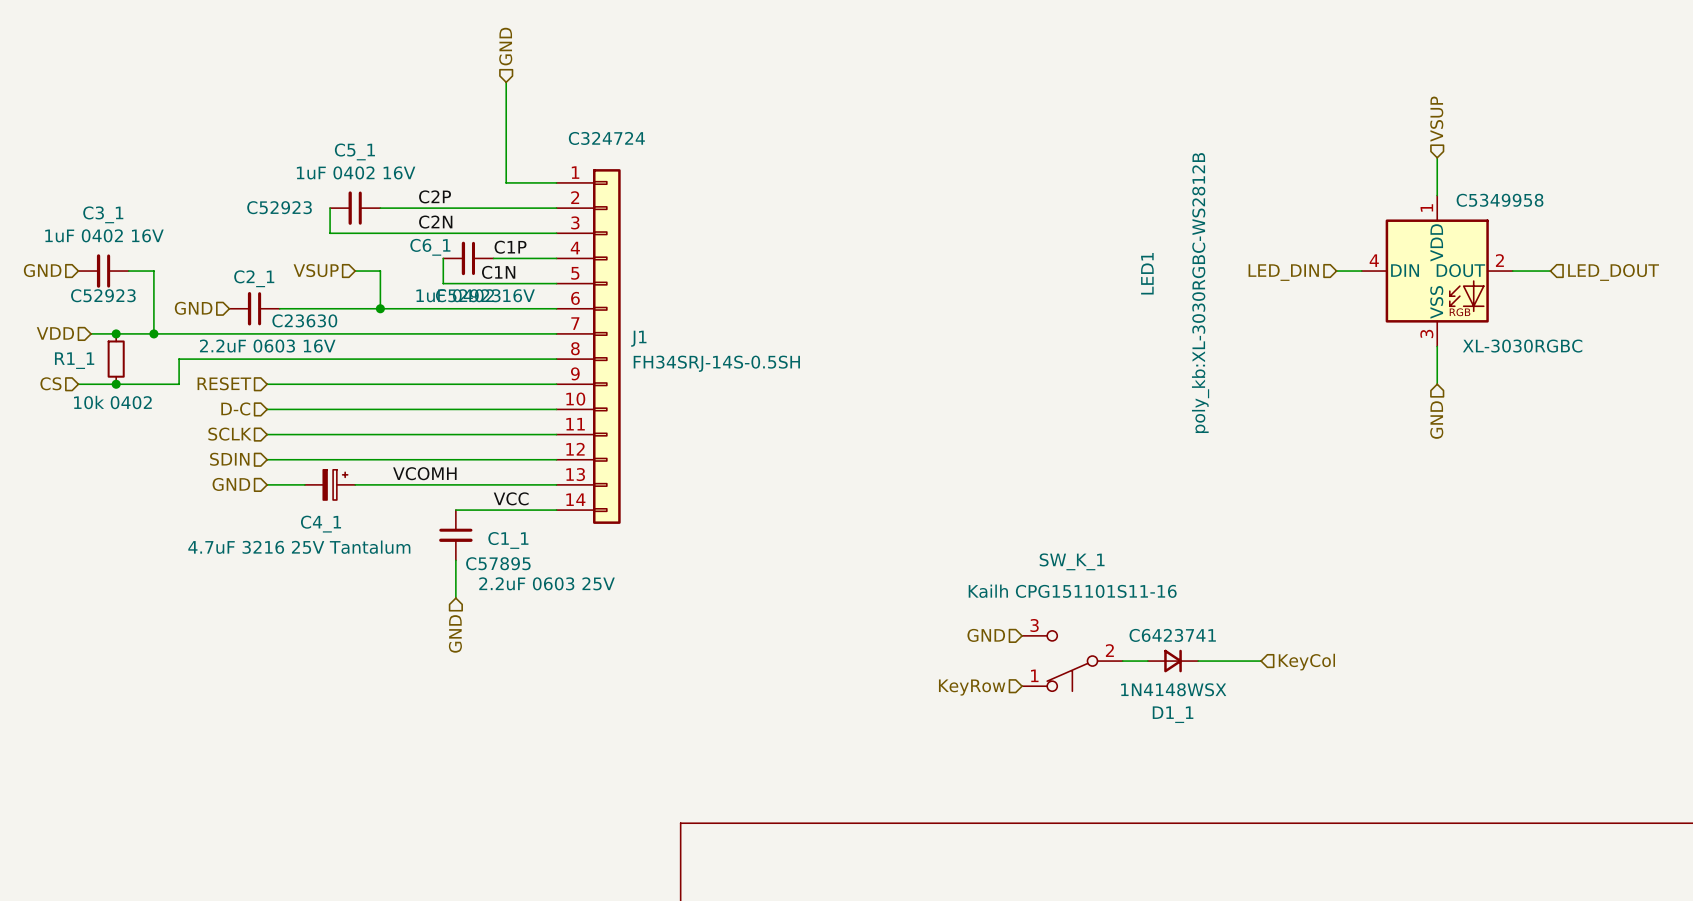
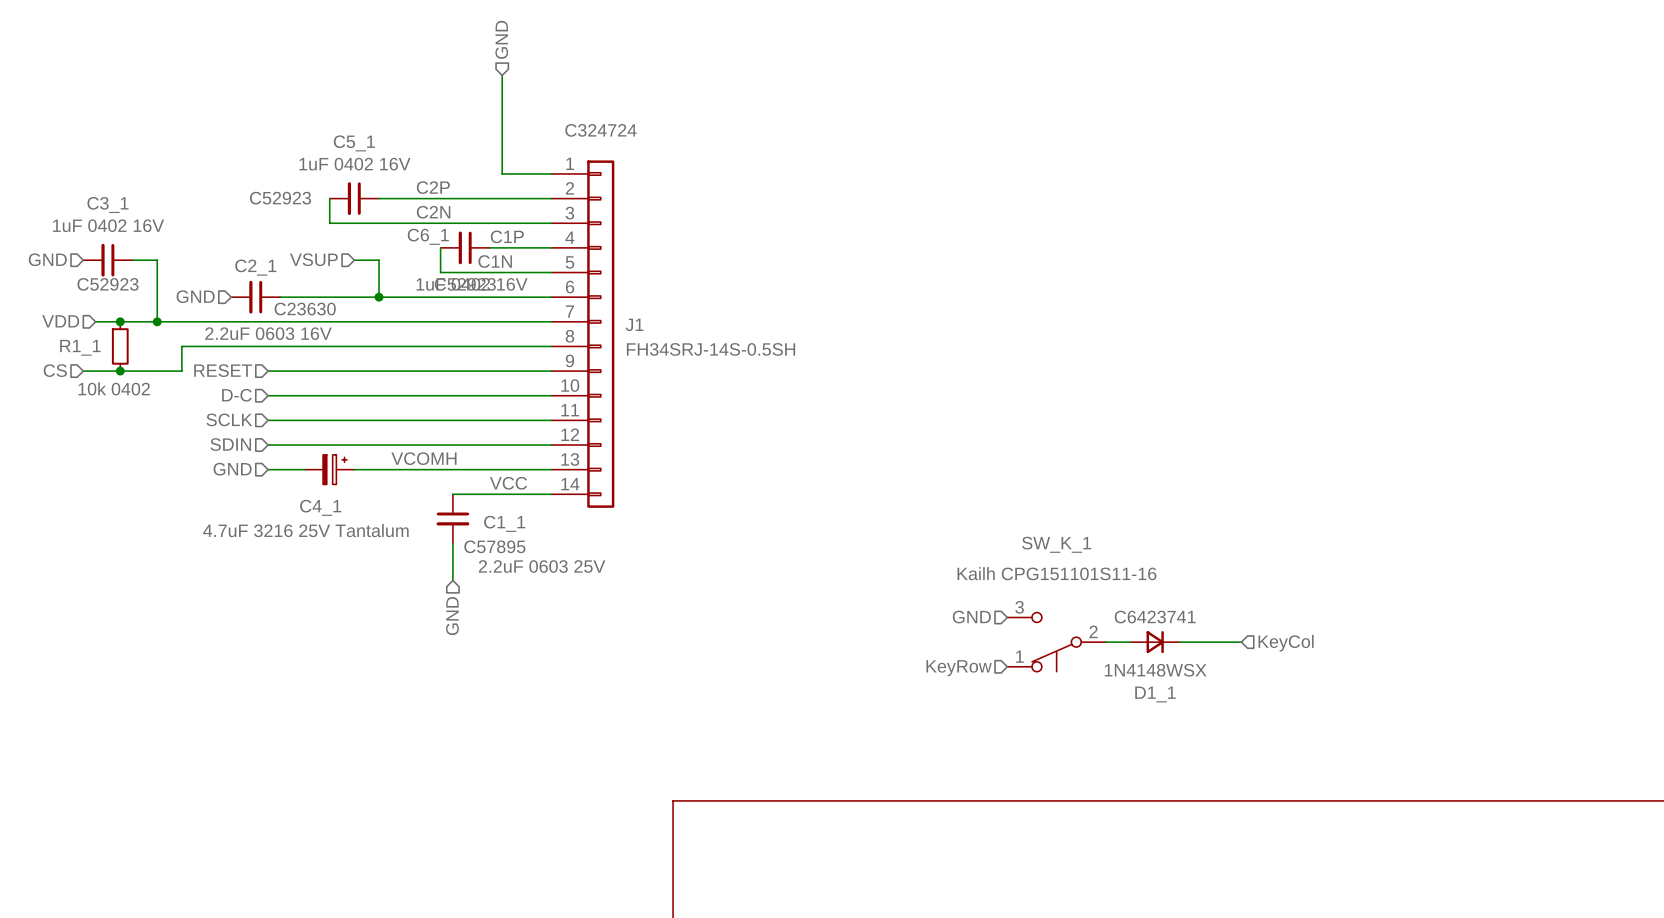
hierarchical label: VSUP (1436, 119) -> none
wire: (1437, 157) (1437, 195) -> none
wire: (1336, 271) (1361, 271) -> none
LED1: XL-3030RGBC (1437, 271) -> none
wire: (1512, 271) (1550, 271) -> none
hierarchical label: LED_DIN (1283, 272) -> none
hierarchical label: LED_DOUT (1613, 272) -> none
wire: (1437, 346) (1437, 384) -> none
hierarchical label: GND (1436, 420) -> none

